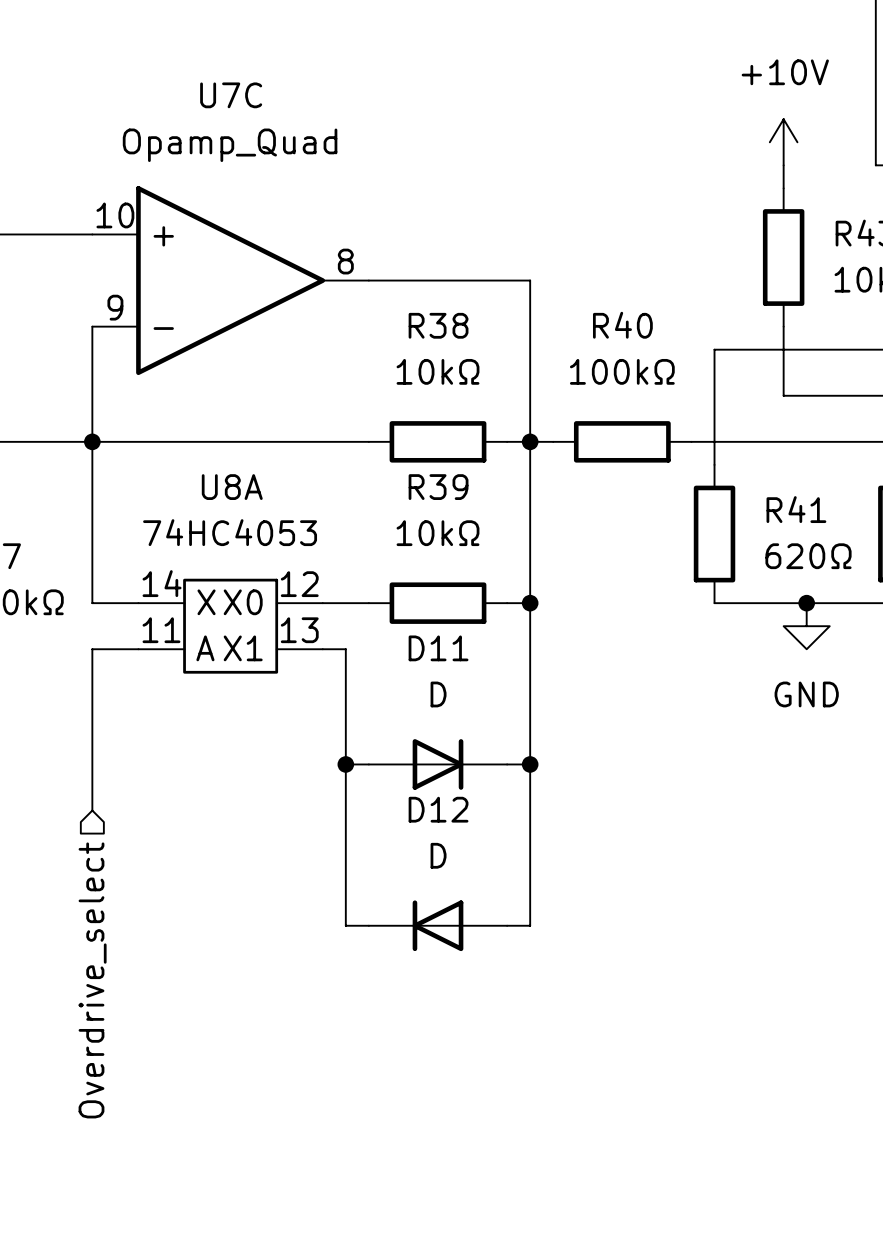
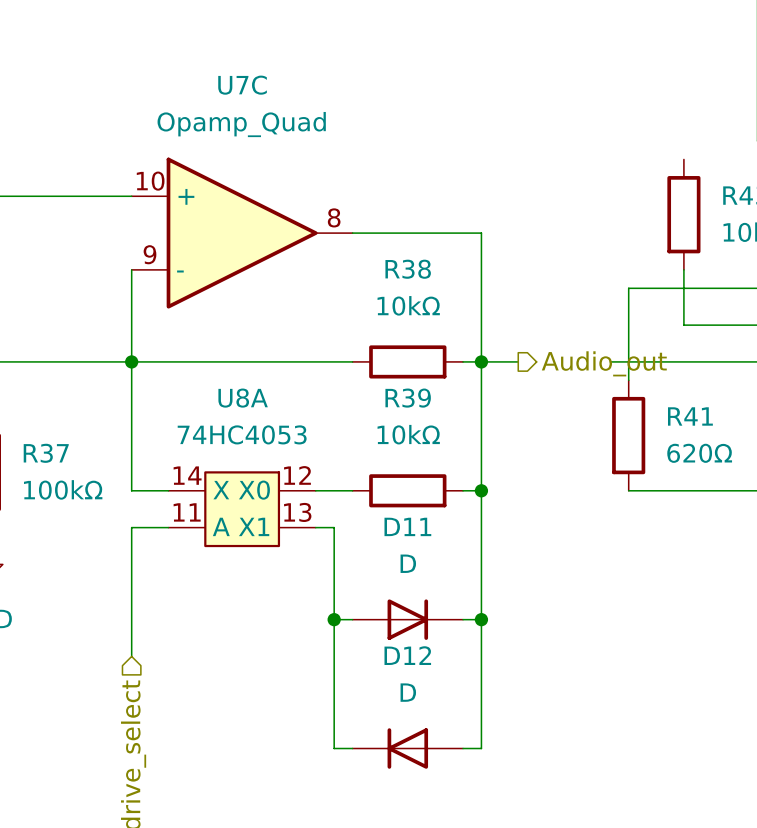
power symbol: +10V (783, 142) -> none
wire: (783, 165) (783, 188) -> none
R40: 100kΩ (622, 441) -> none
hierarchical label: none -> Audio_out (604, 363)
junction: (806, 603) -> none
power symbol: GND (806, 626) -> none

